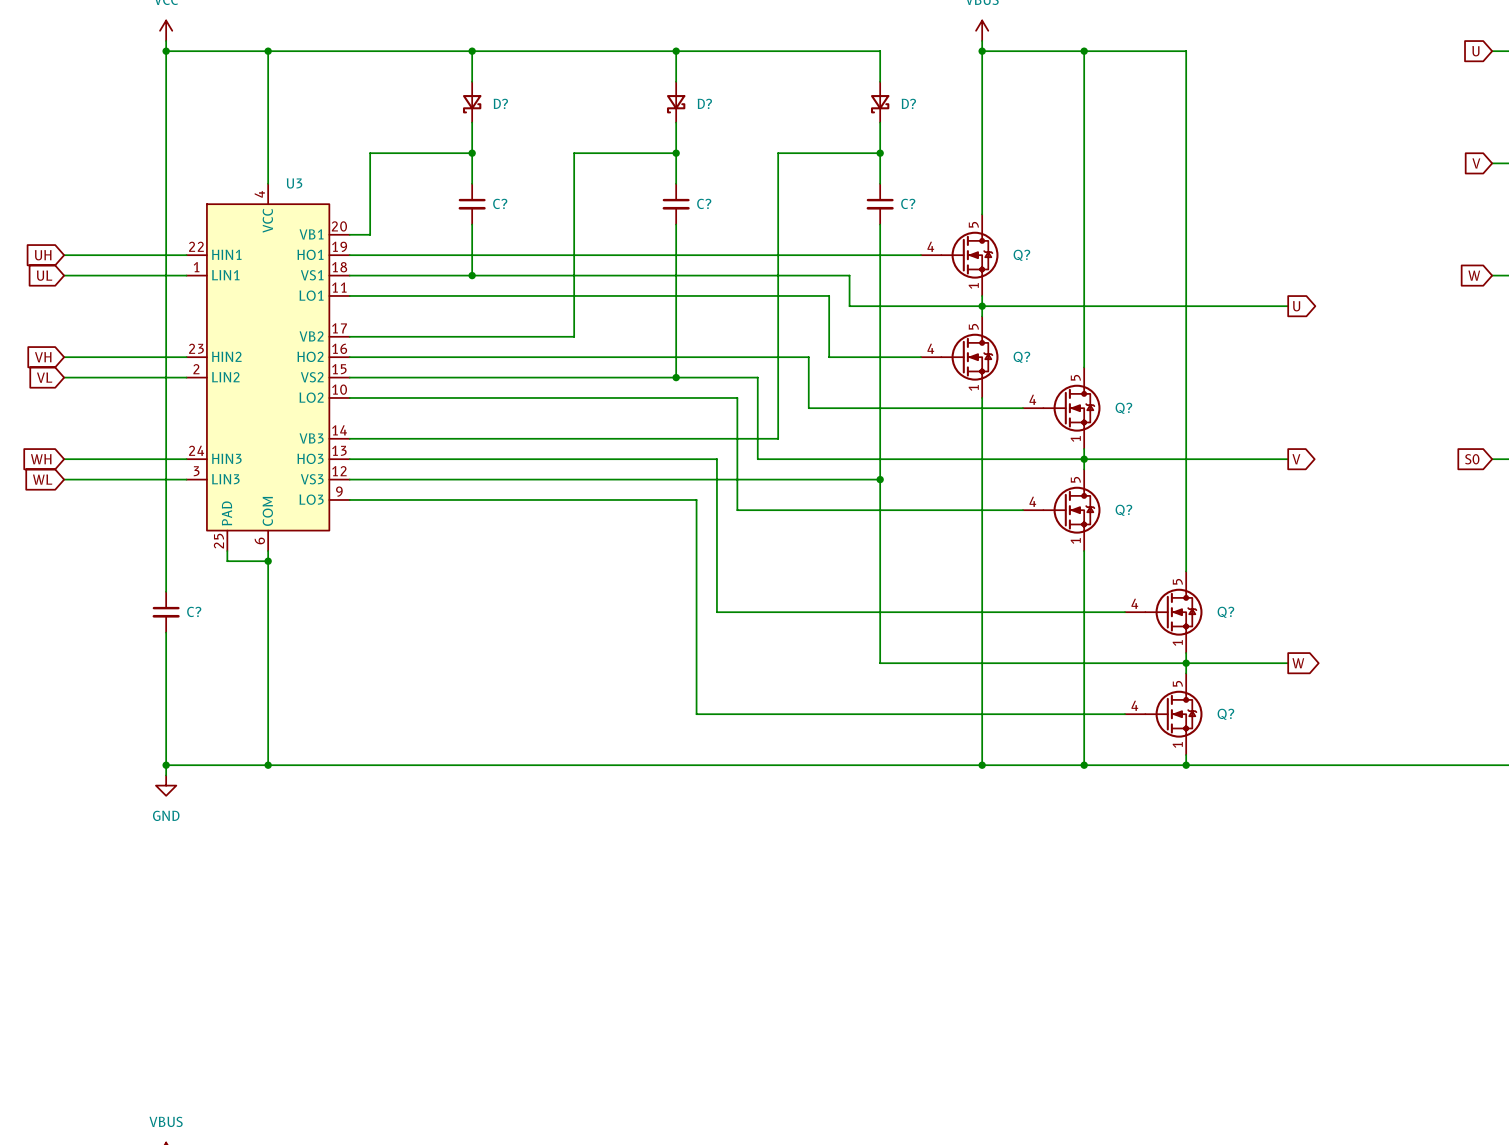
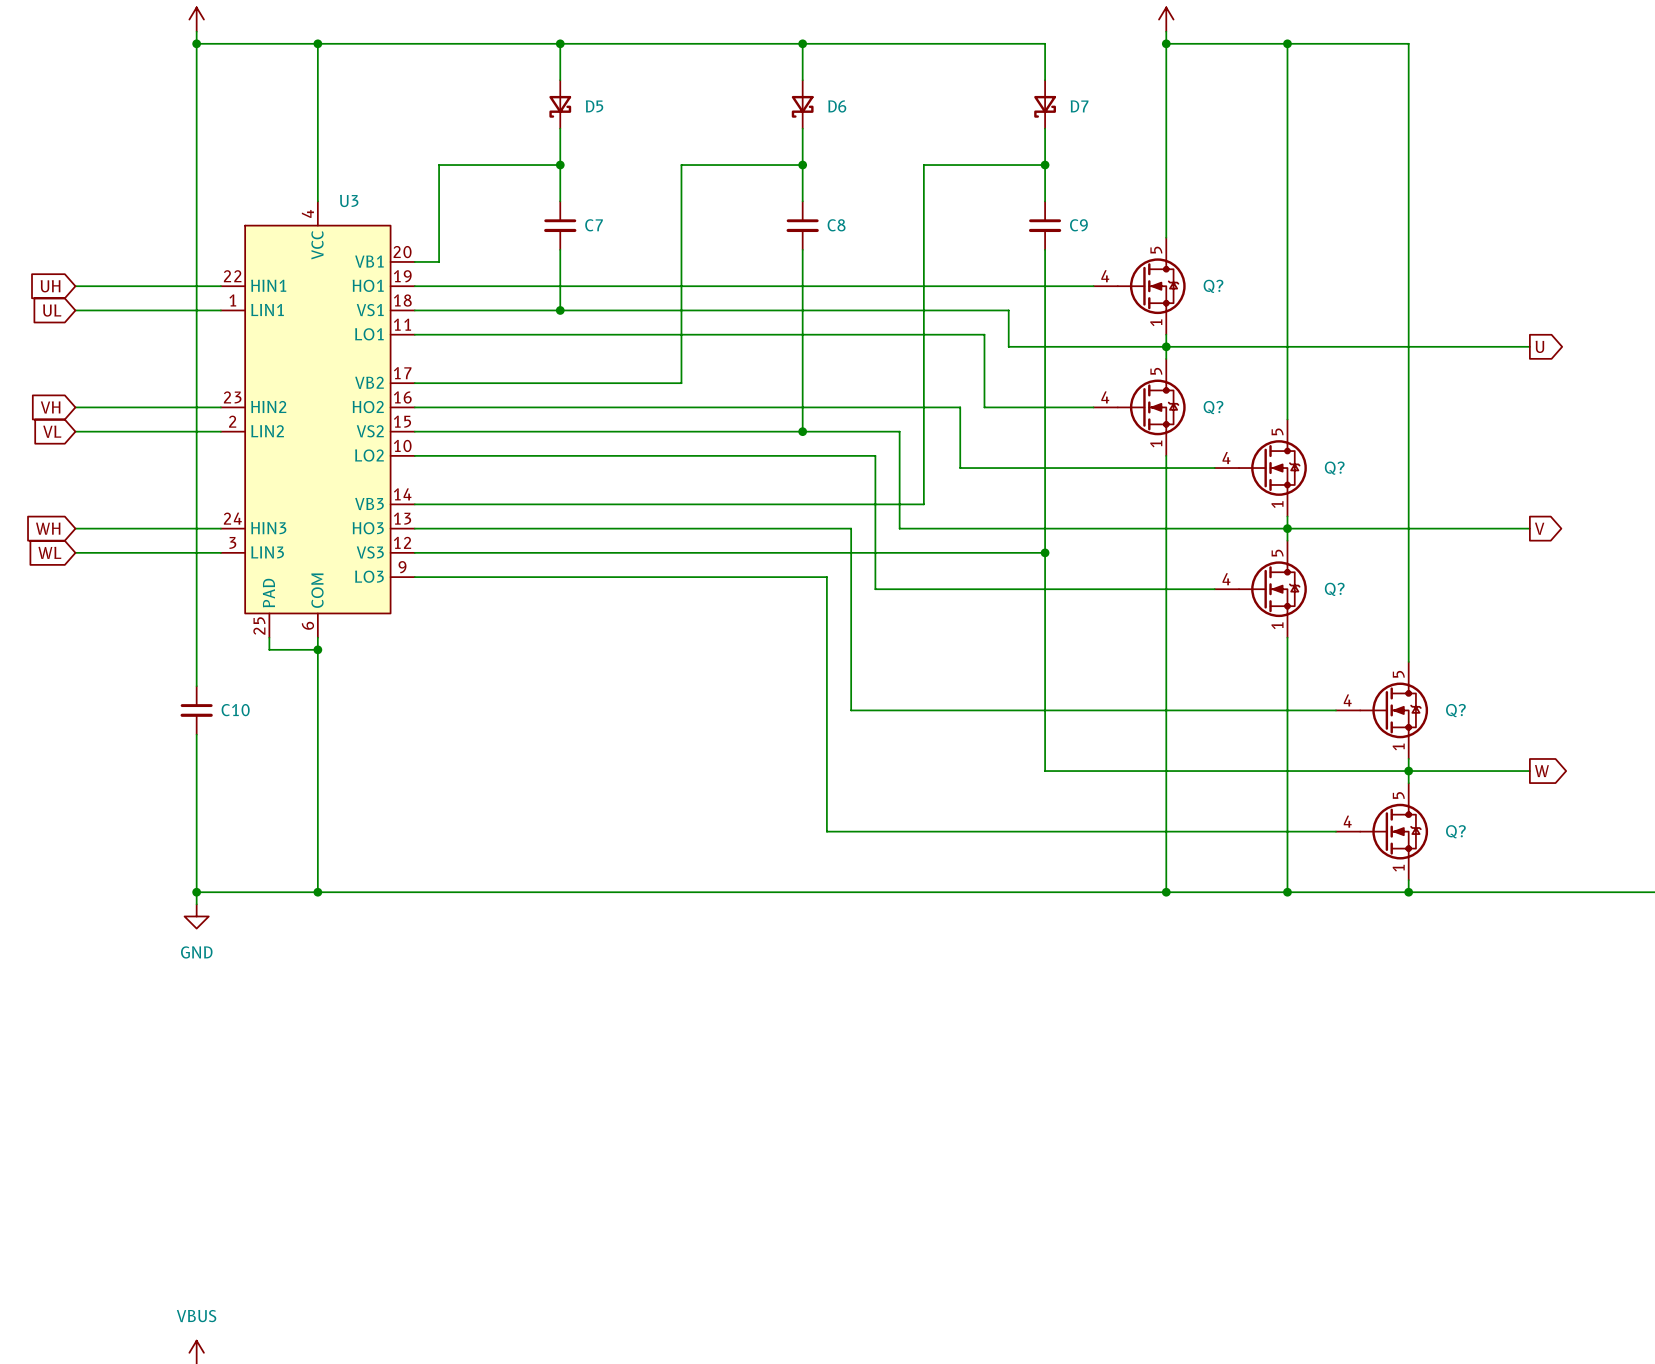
D? name: D? (500, 103) -> D5 (594, 106)
D? name: D? (704, 103) -> D6 (837, 106)
D? name: D? (908, 103) -> D7 (1079, 106)
C? name: C? (500, 203) -> C7 (594, 225)
C? name: C? (704, 203) -> C8 (836, 225)
C? name: C? (908, 203) -> C9 (1078, 225)
C? name: C? (194, 611) -> C10 (235, 710)

